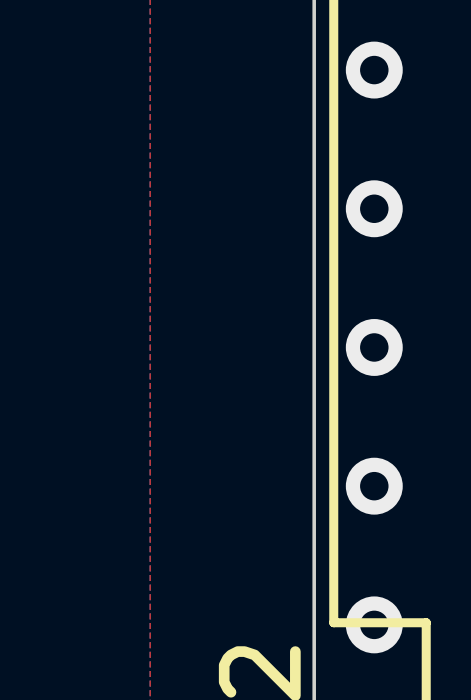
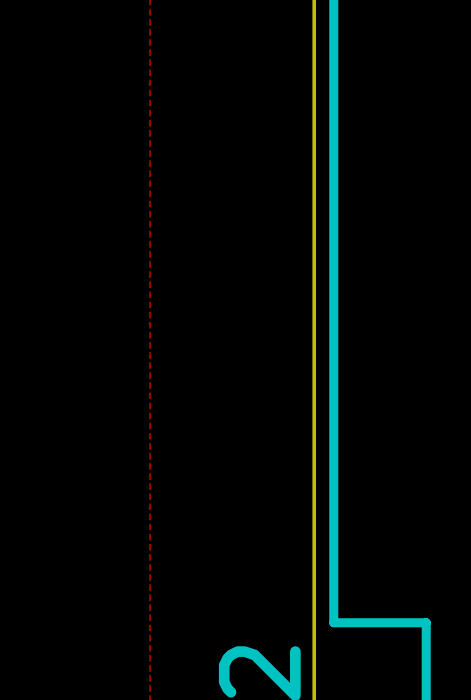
via: (374, 70) -> none
via: (374, 208) -> none
via: (374, 347) -> none
via: (374, 486) -> none
via: (374, 624) -> none

